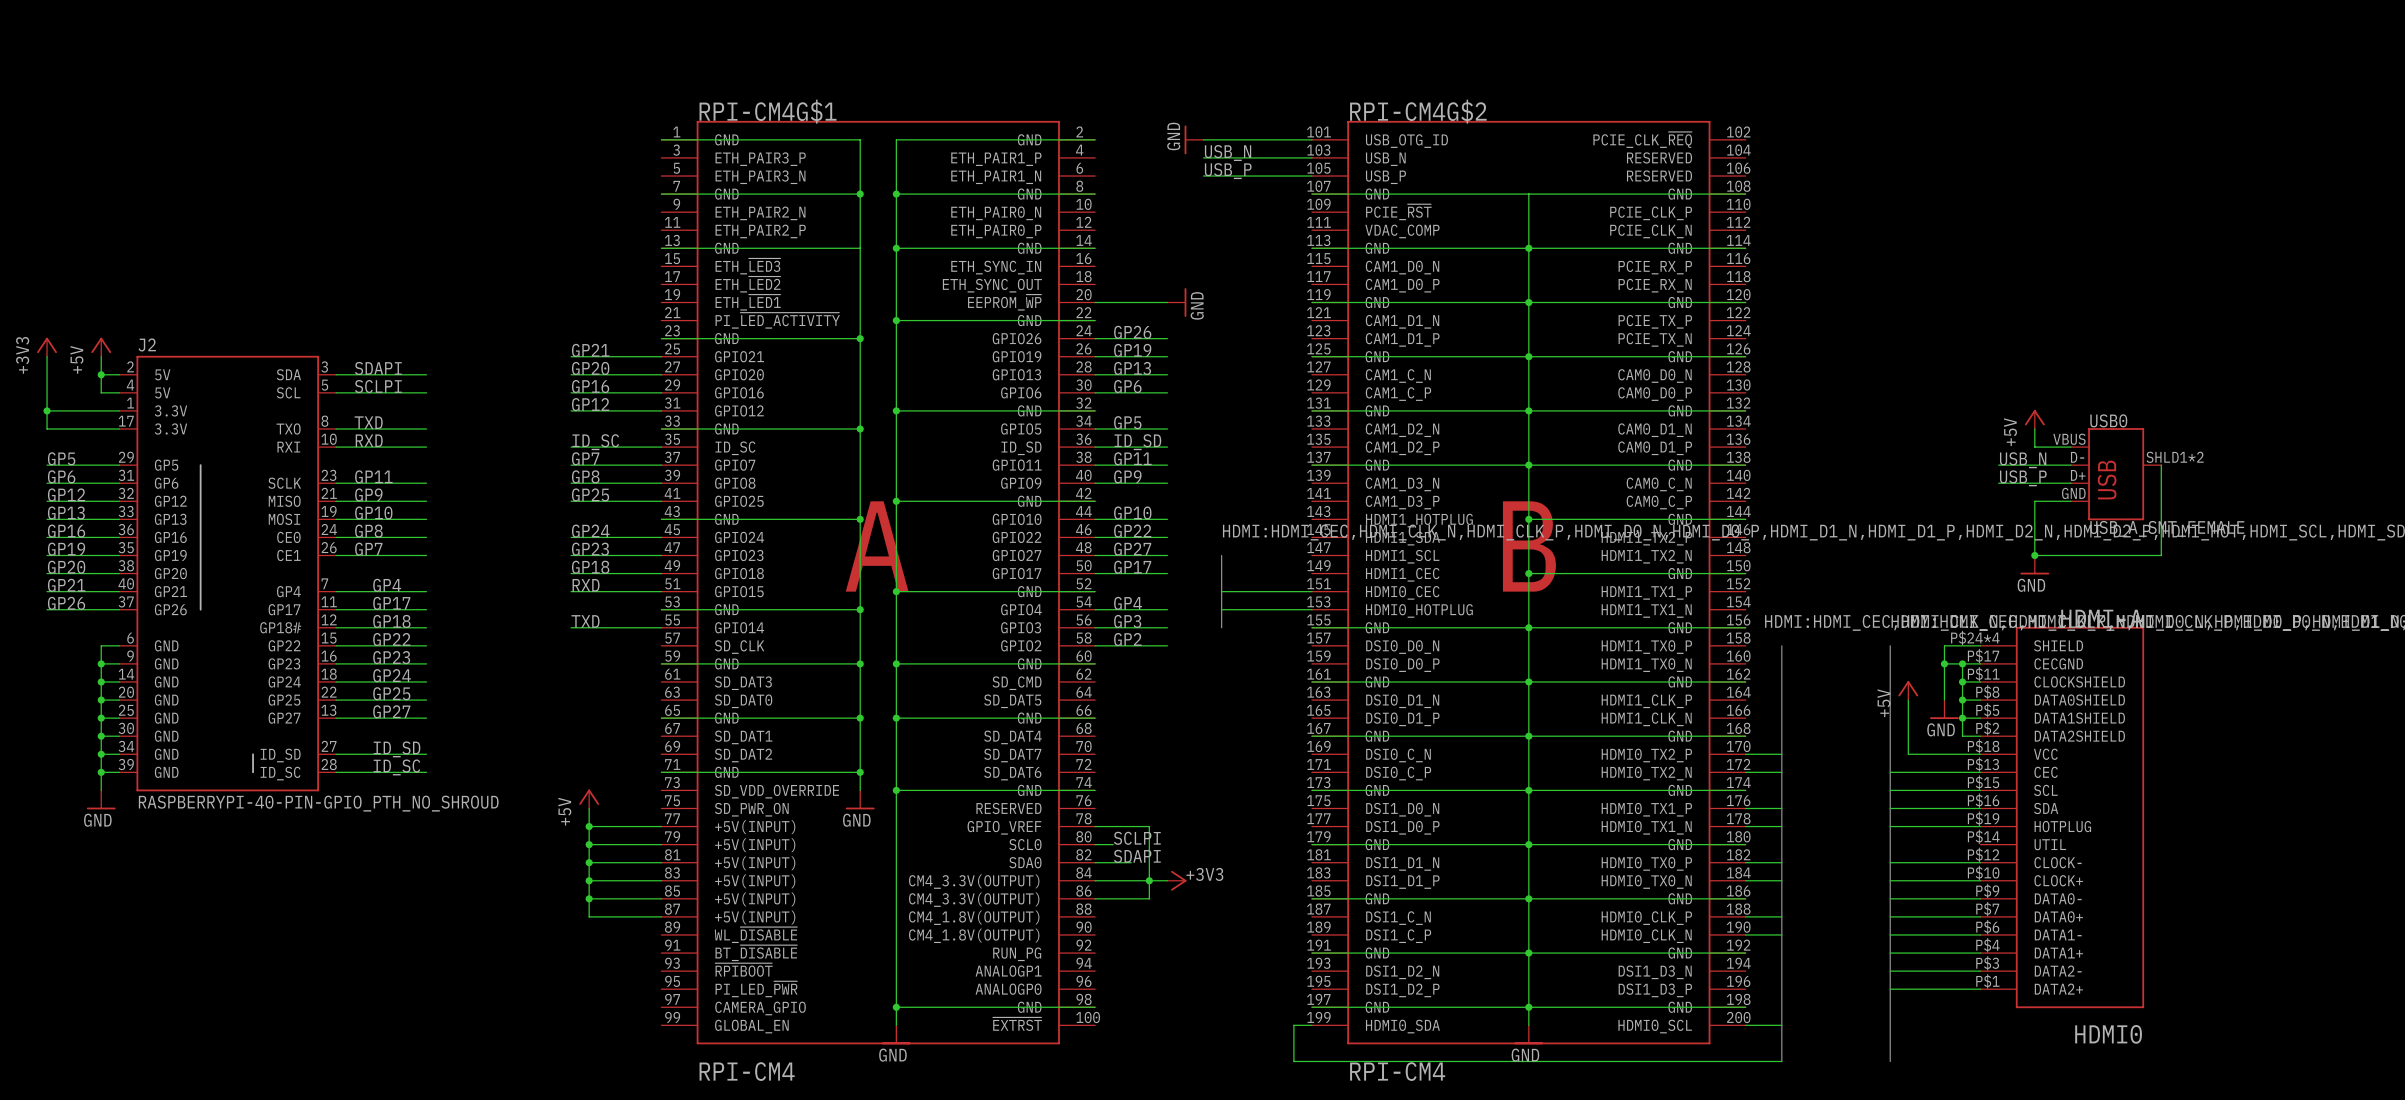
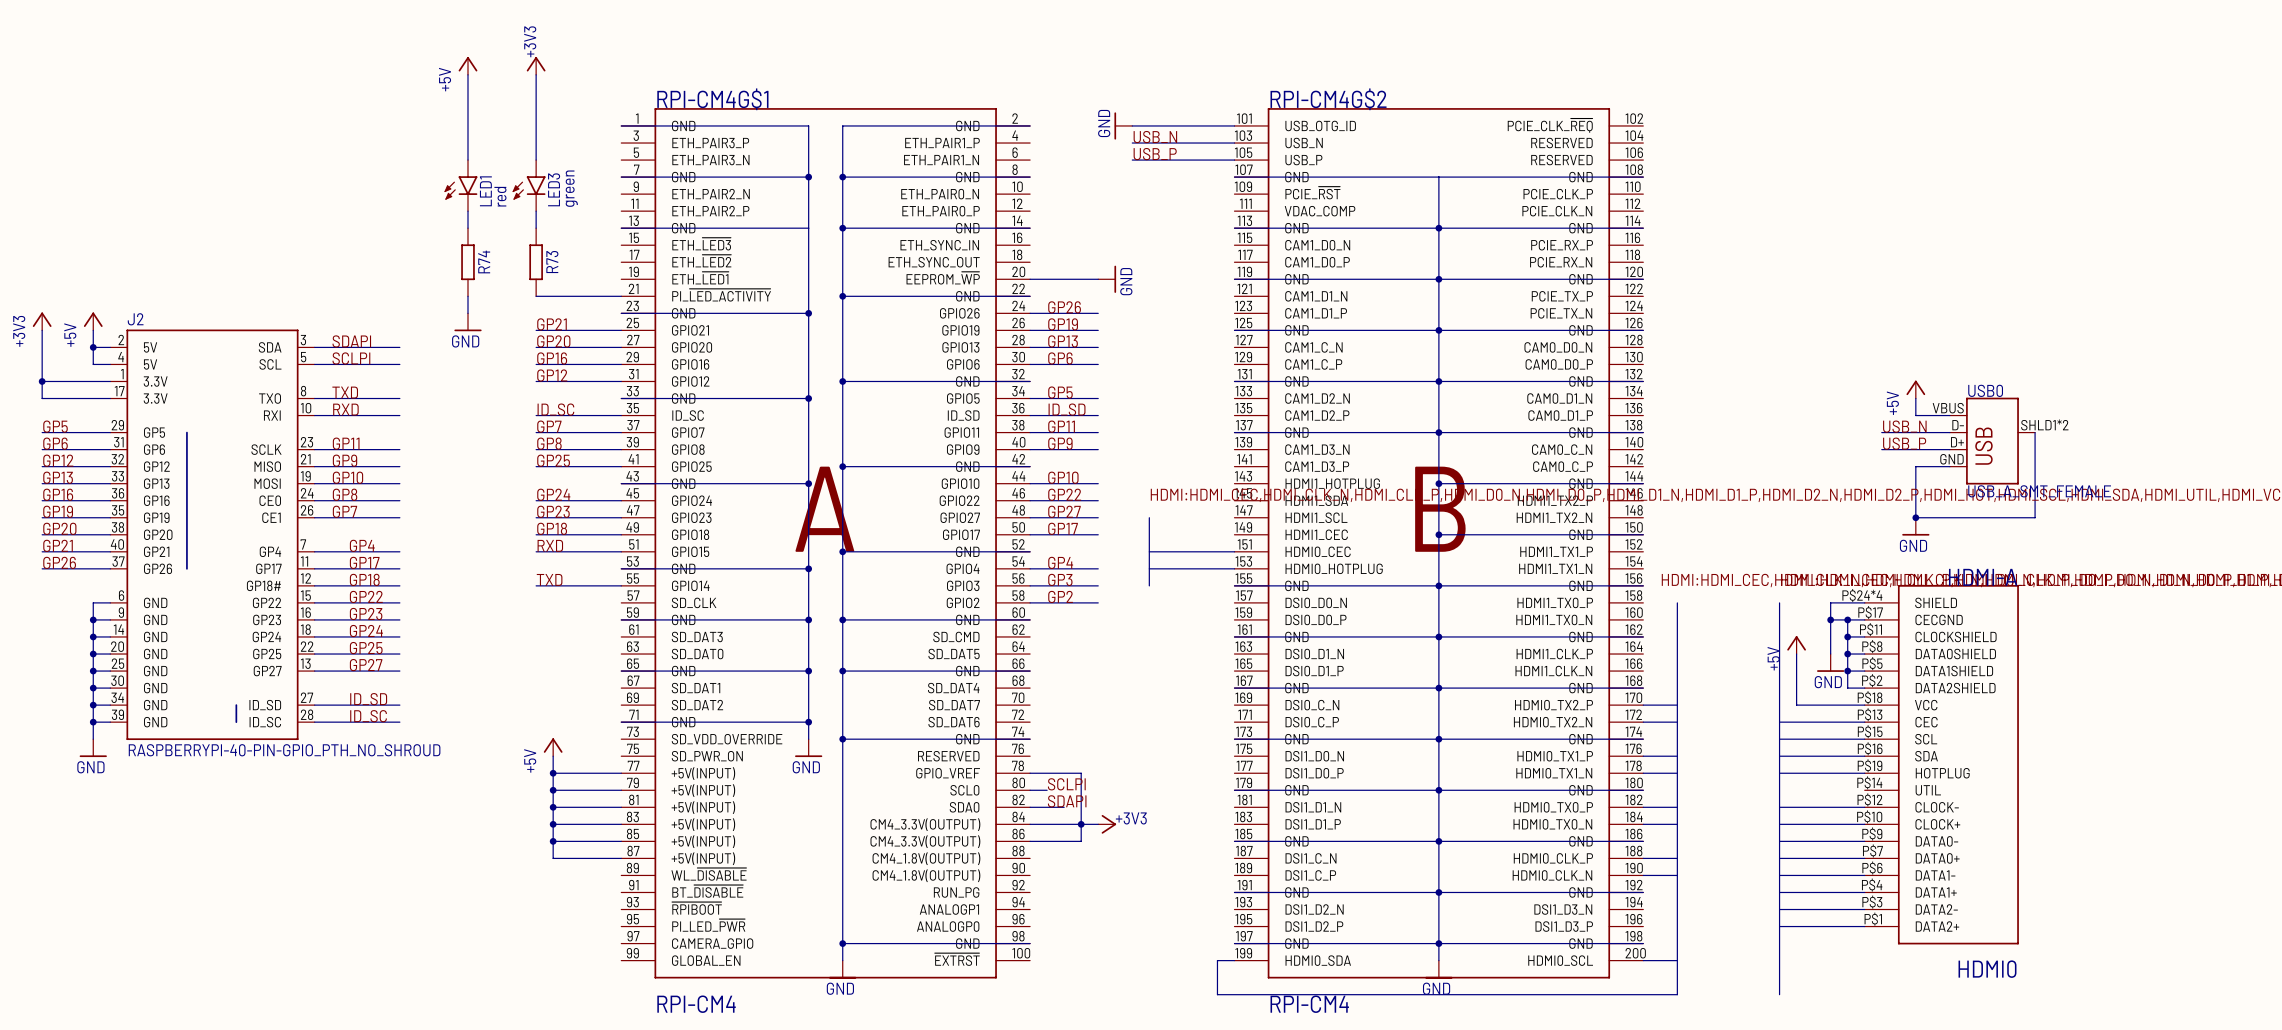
power symbol: none -> +5V (468, 65)
power symbol: none -> +3V3 (536, 65)
wire: none -> (468, 74) (468, 160)
wire: none -> (536, 74) (536, 160)
LED1: none -> red (460, 185)
LED3: none -> green (529, 185)
wire: none -> (468, 211) (468, 228)
wire: none -> (536, 211) (536, 228)
R74: none -> (468, 262)
R73: none -> (536, 262)
wire: none -> (468, 296) (468, 313)
wire: none -> (536, 296) (621, 296)
power symbol: none -> GND (468, 322)

